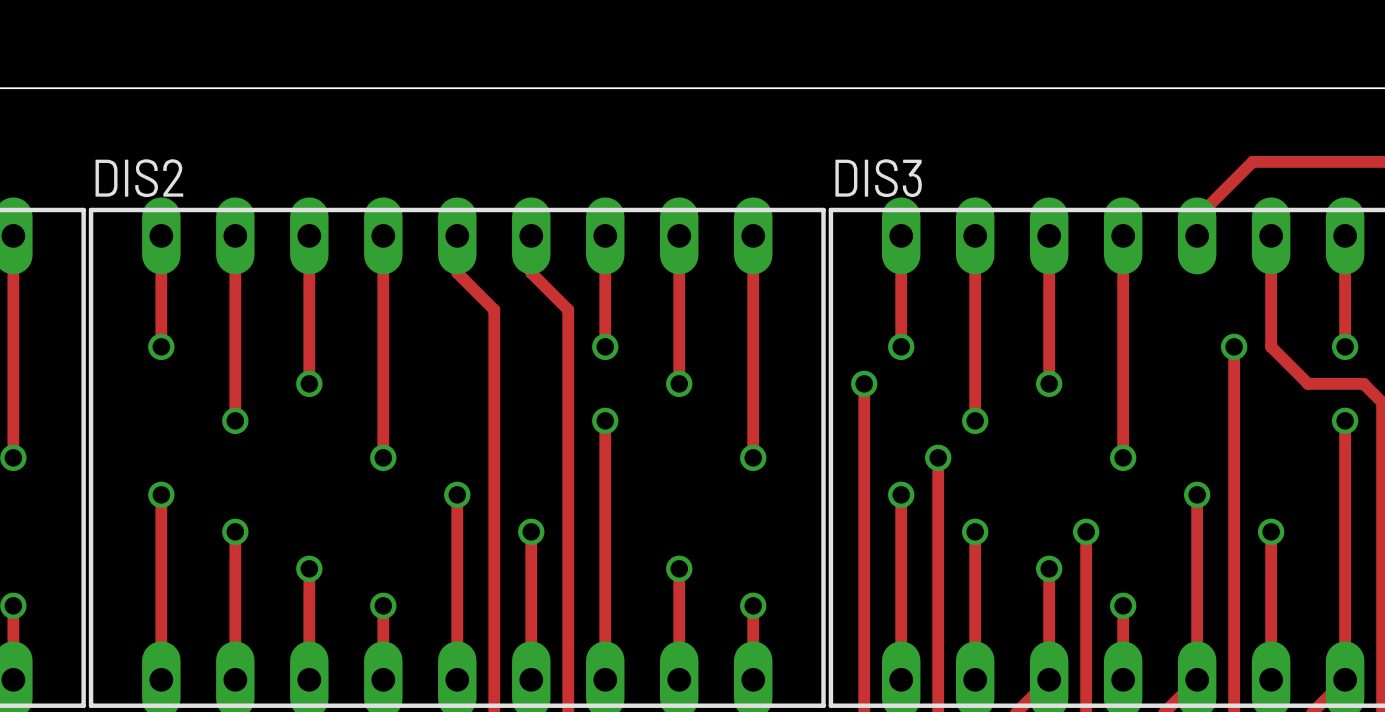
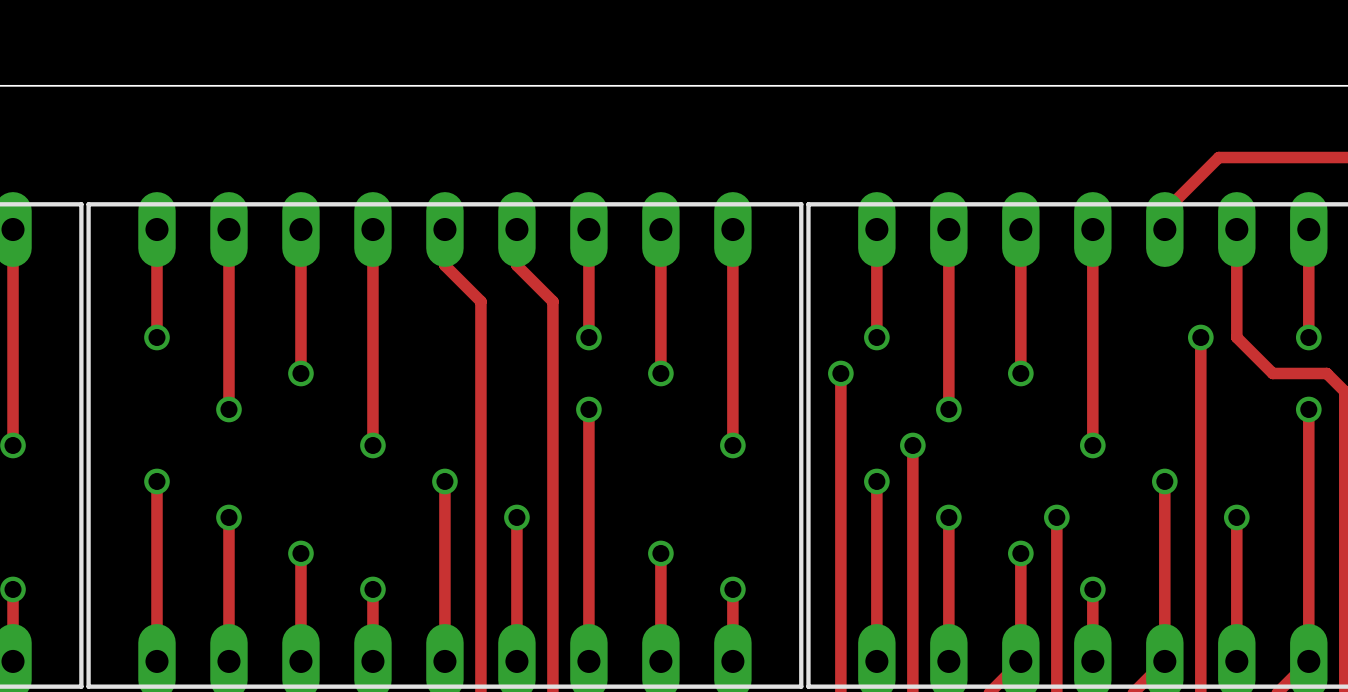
DIS2 name: DIS2 (139, 178) -> none
DIS3 name: DIS3 (878, 178) -> none

